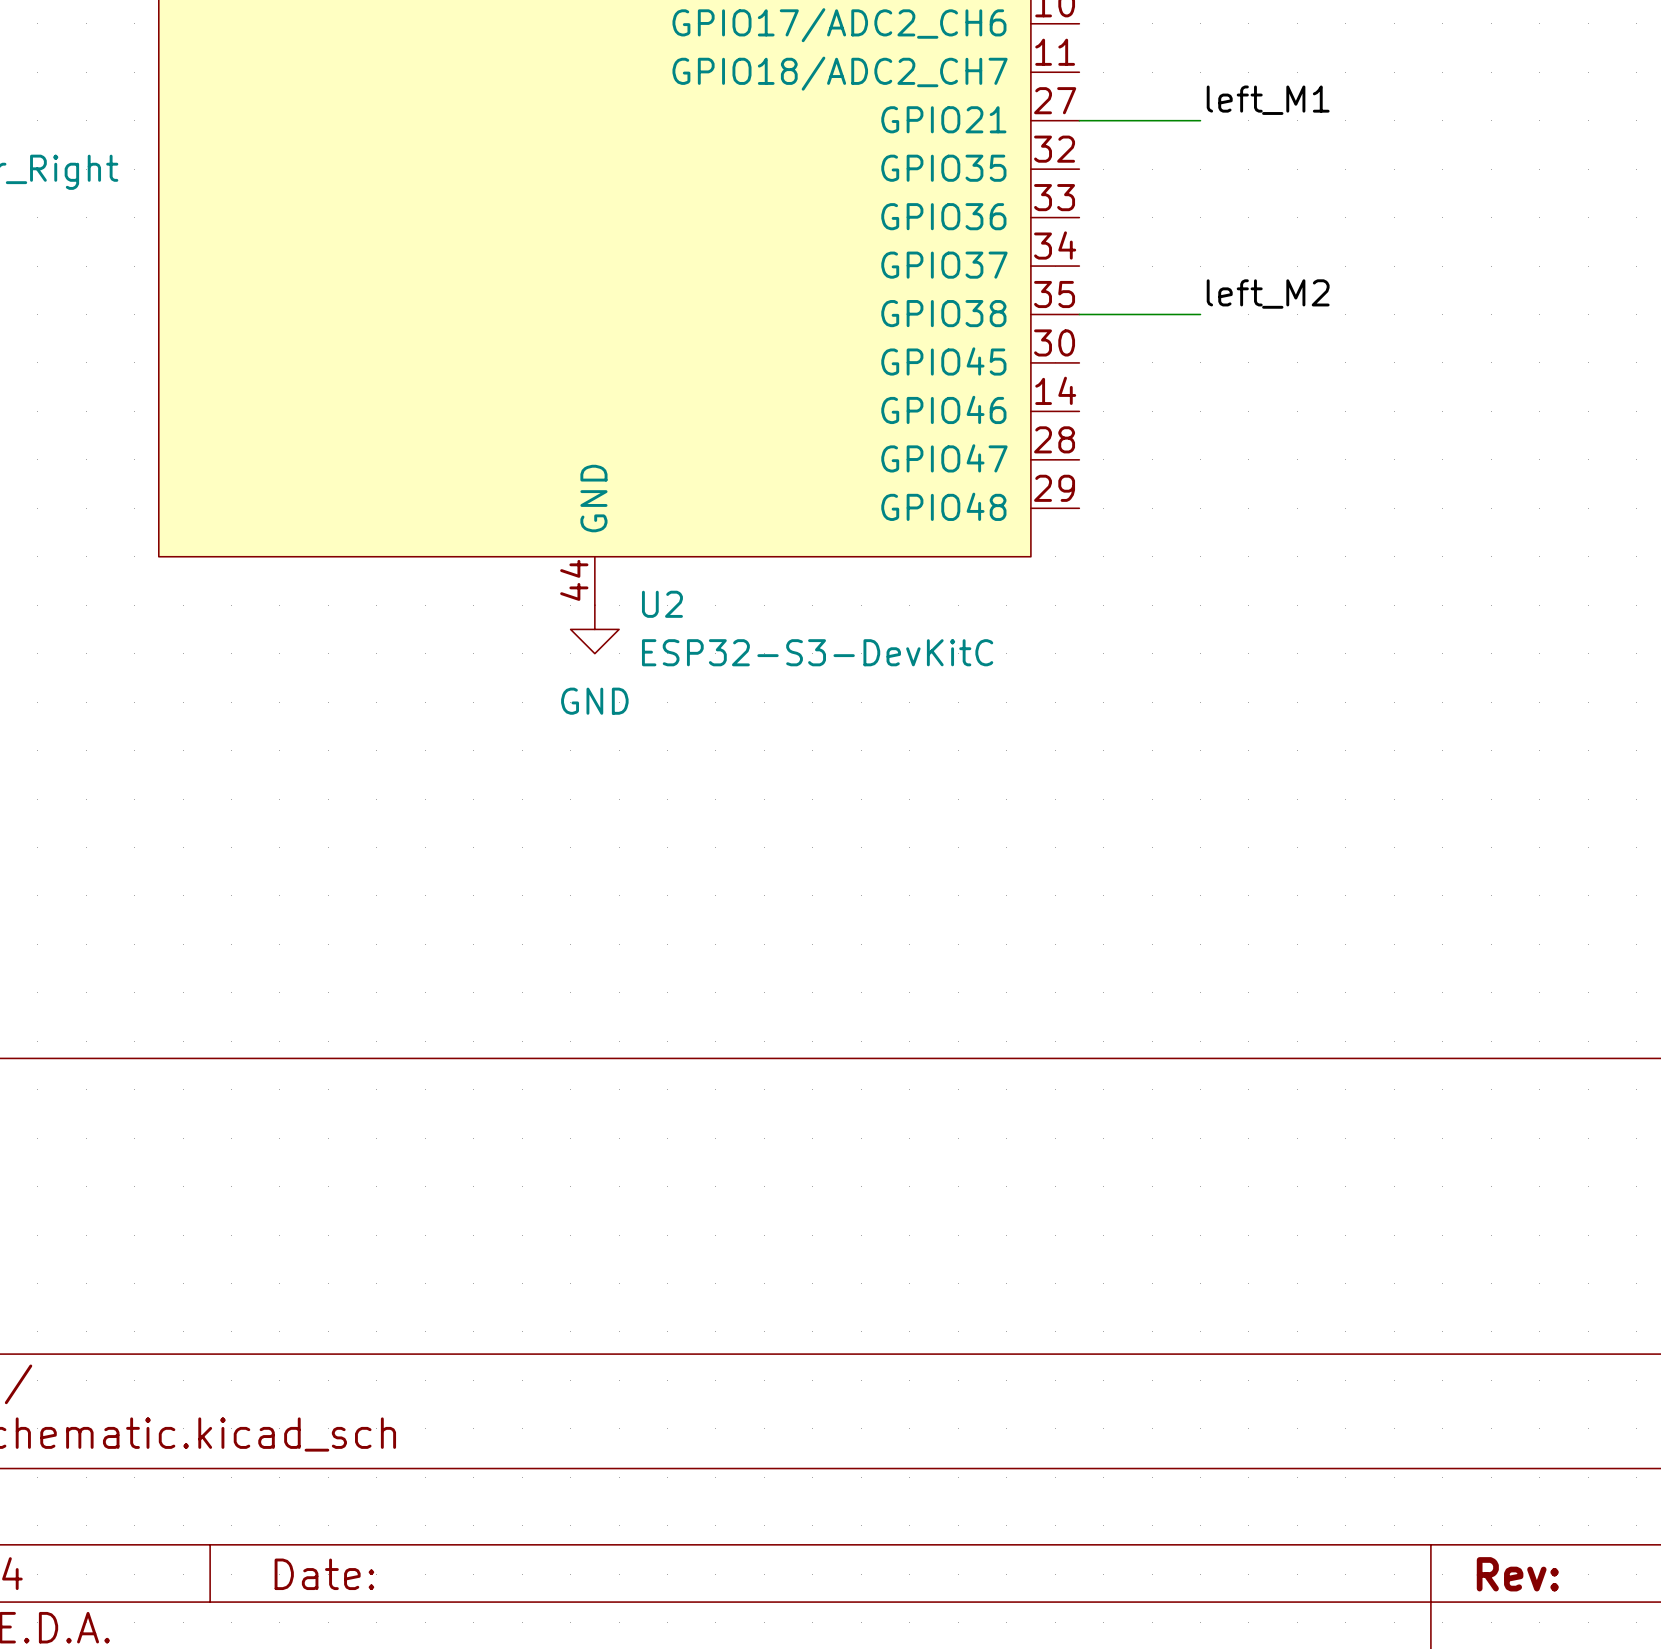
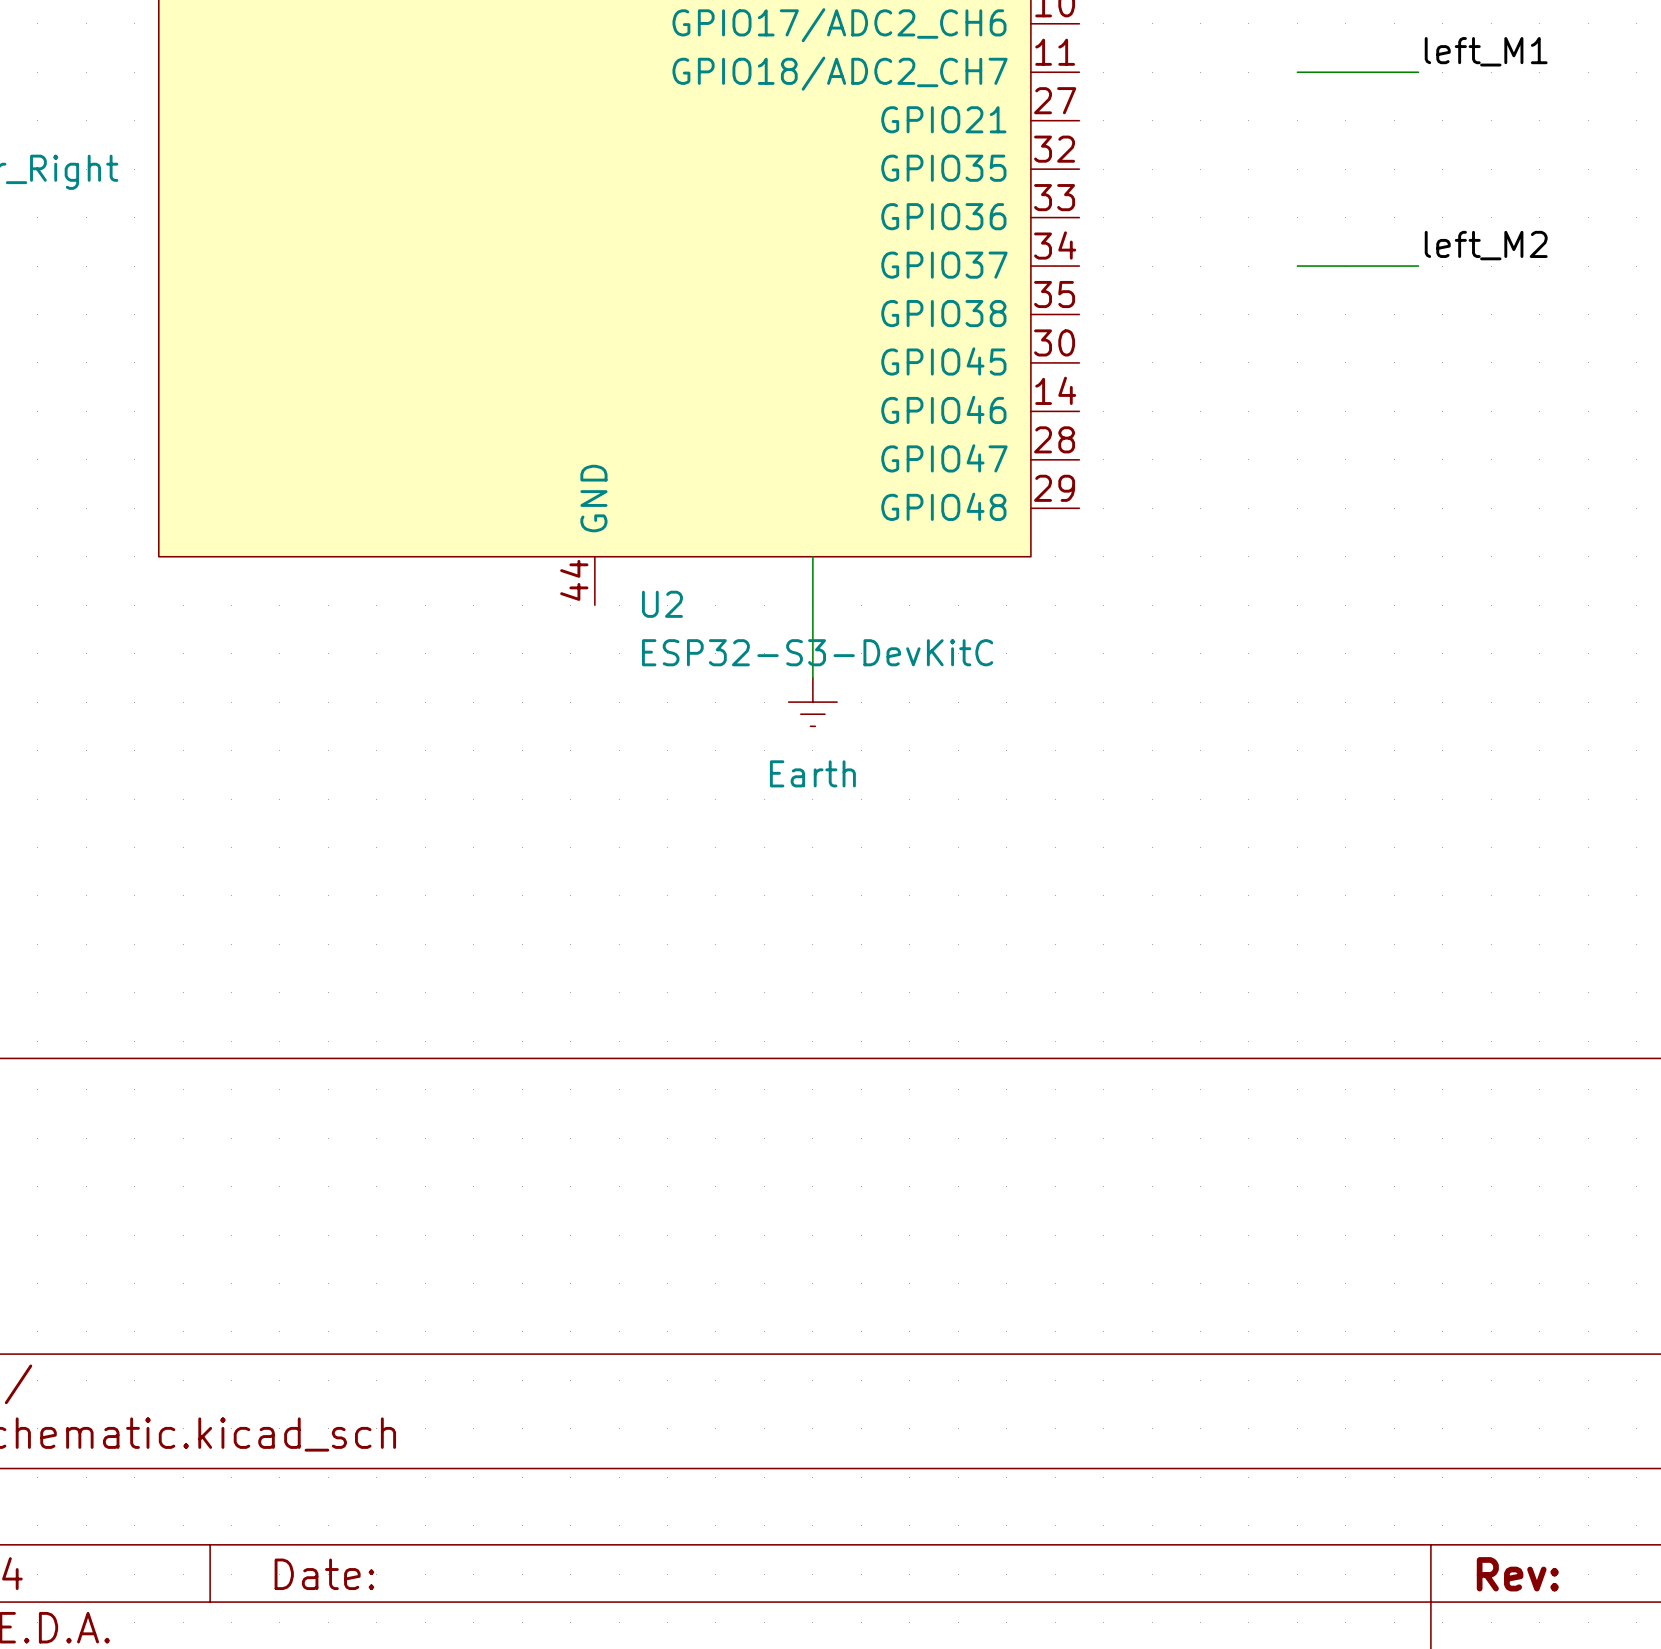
label position: left_M1 (1268, 100) -> left_M1 (1486, 51)
wire: (1079, 120) (1200, 120) -> (1297, 72) (1418, 72)
label position: left_M2 (1268, 294) -> left_M2 (1486, 245)
wire: (1079, 314) (1200, 314) -> (1297, 266) (1418, 266)
wire: none -> (812, 556) (812, 677)
power symbol: GND (594, 629) -> none
power symbol: none -> Earth (812, 702)

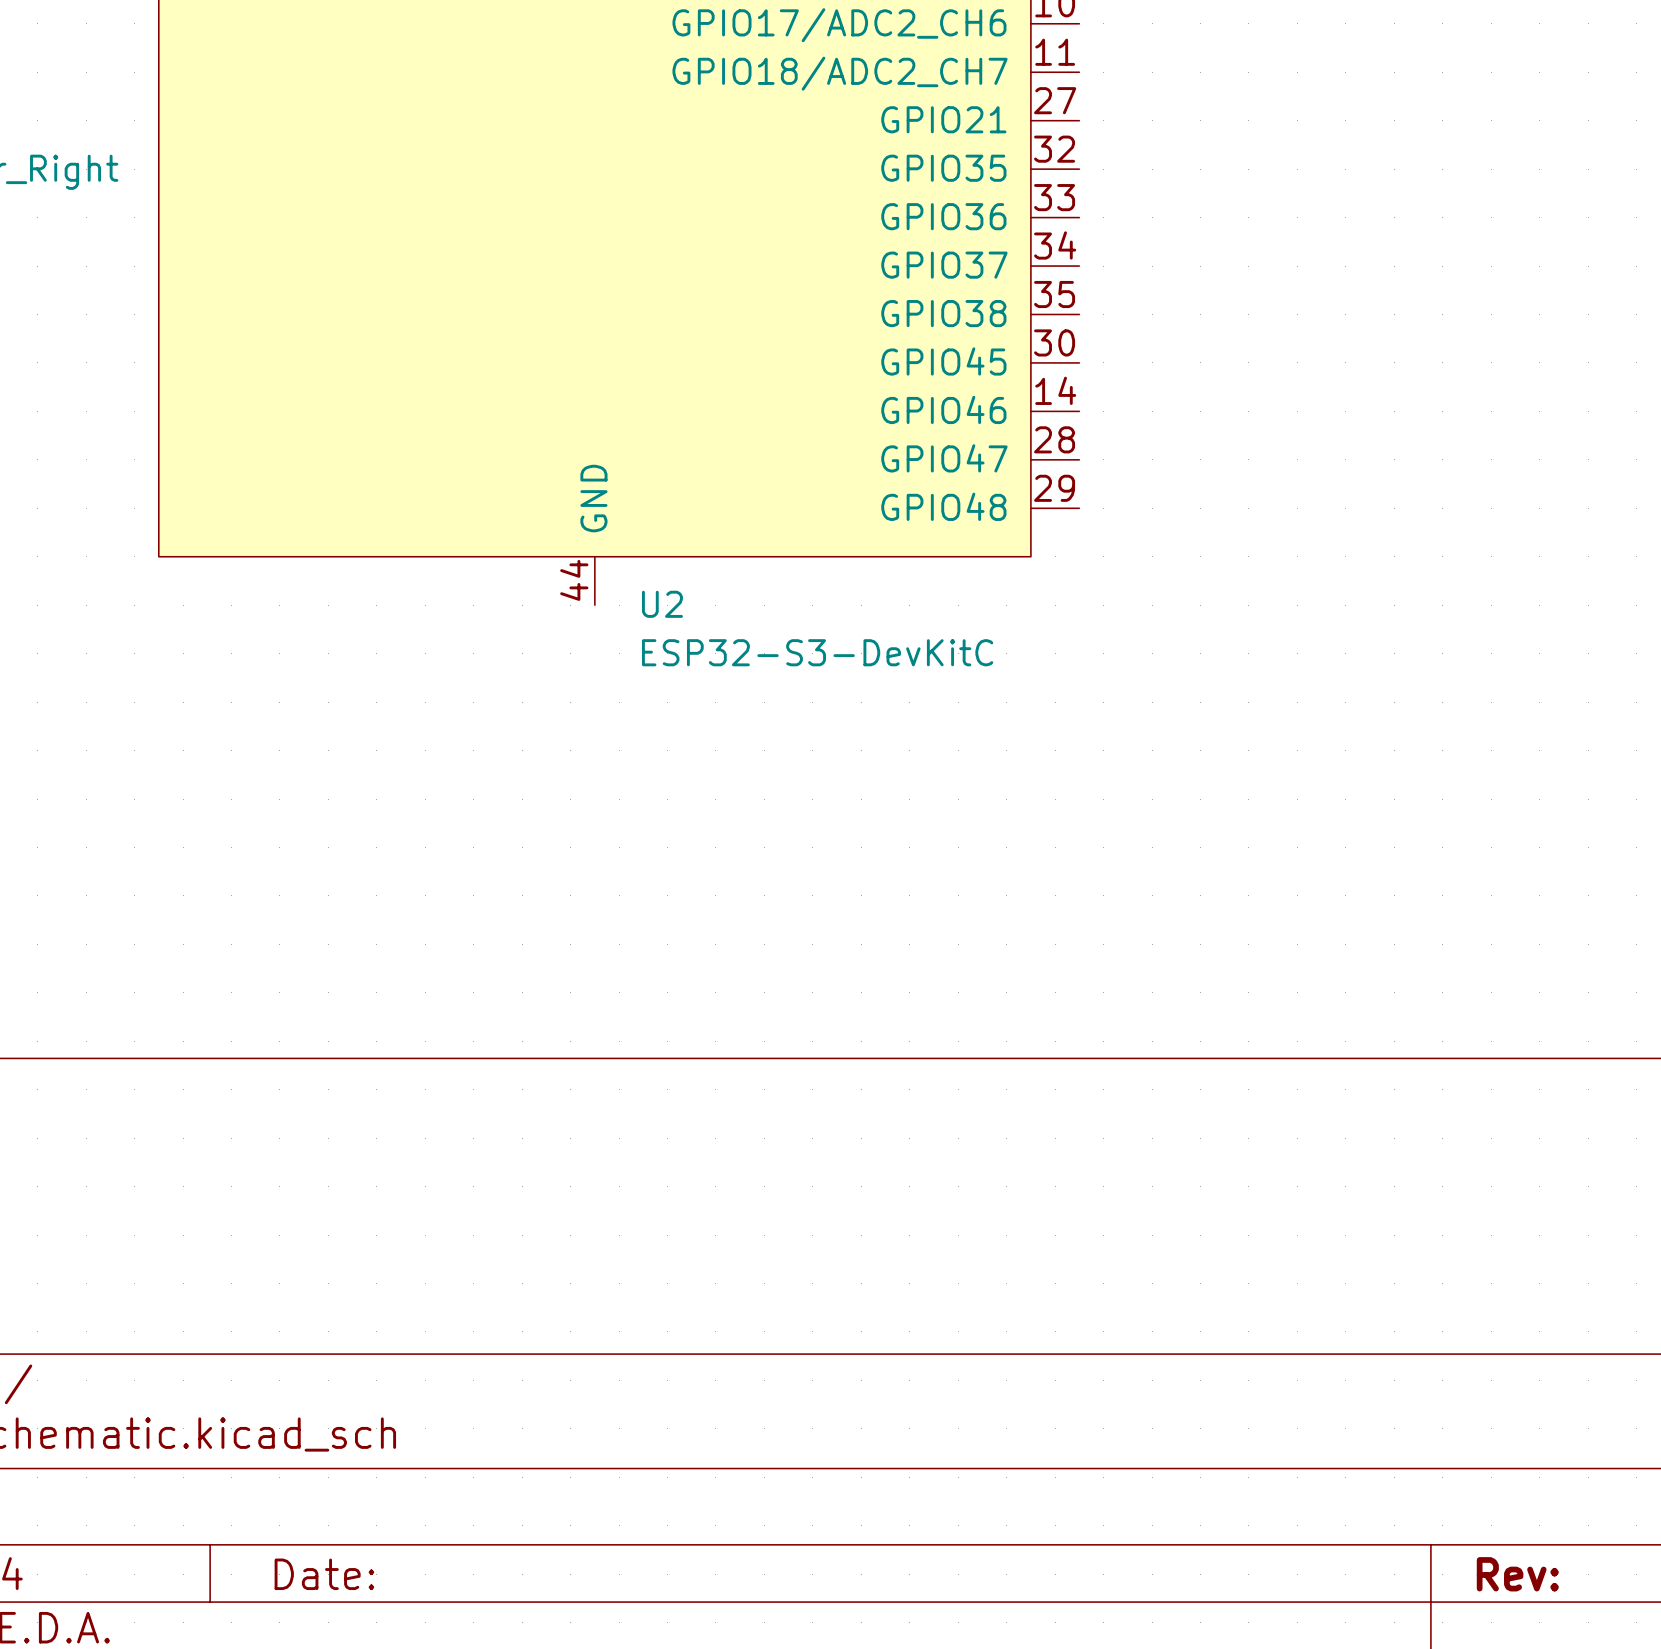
label: left_M1 (1486, 51) -> none
wire: (1297, 72) (1418, 72) -> none
label: left_M2 (1486, 245) -> none
wire: (1297, 266) (1418, 266) -> none
wire: (812, 556) (812, 677) -> none
power symbol: Earth (812, 702) -> none

